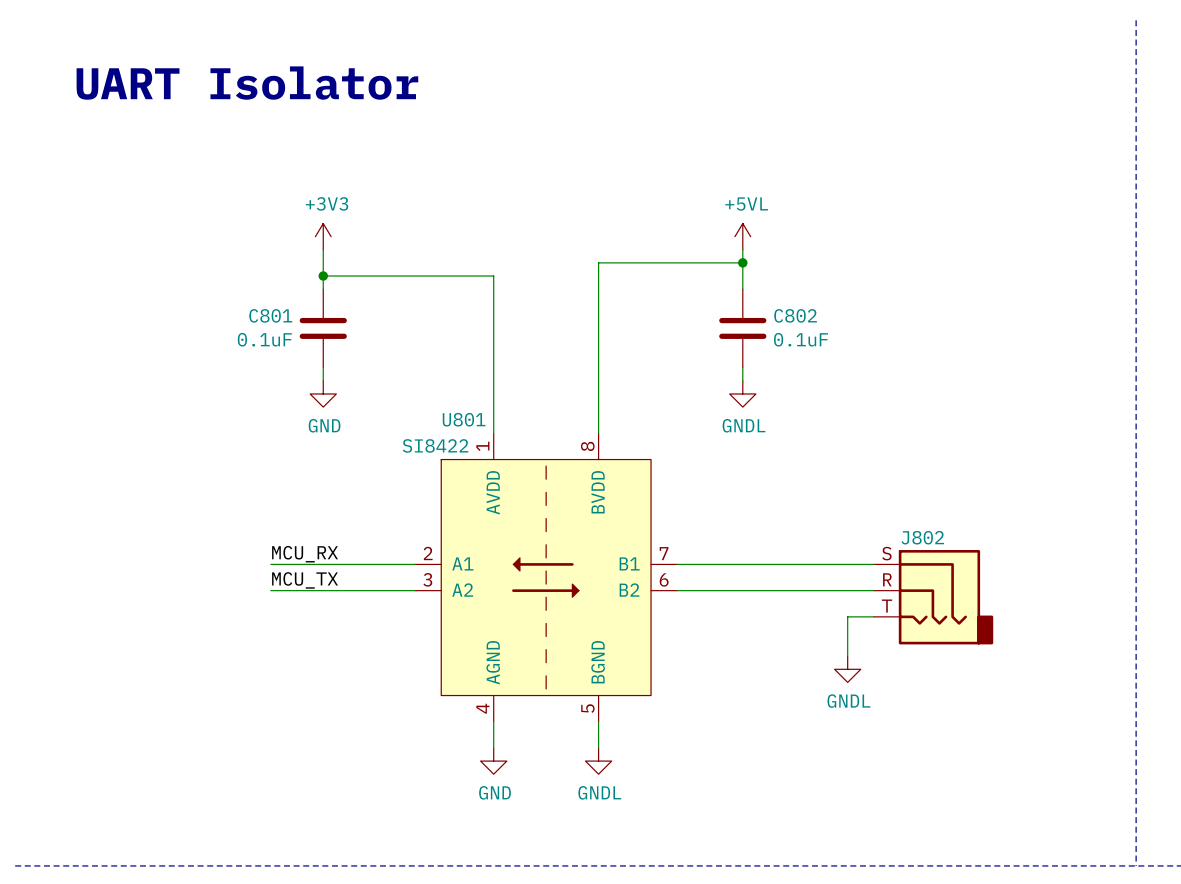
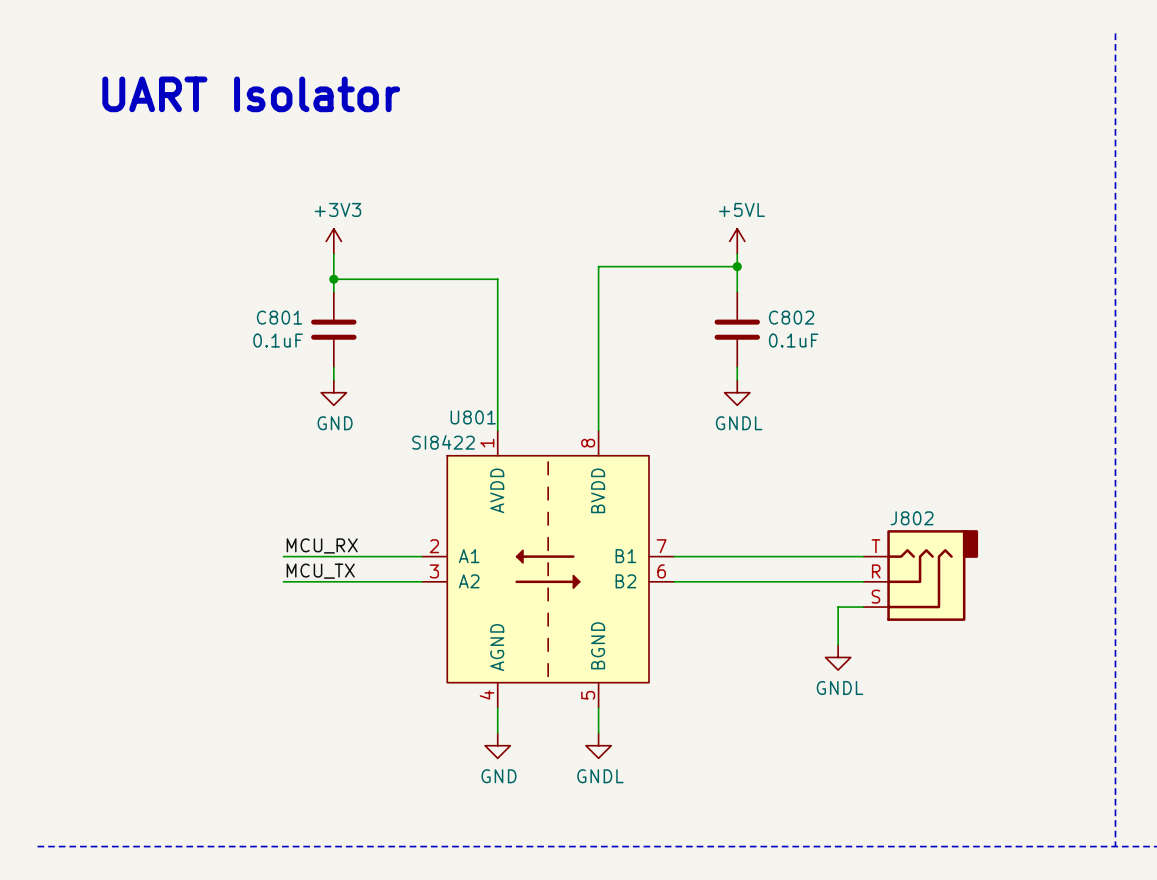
J802 flip: as is (946, 597) -> up-down (932, 575)

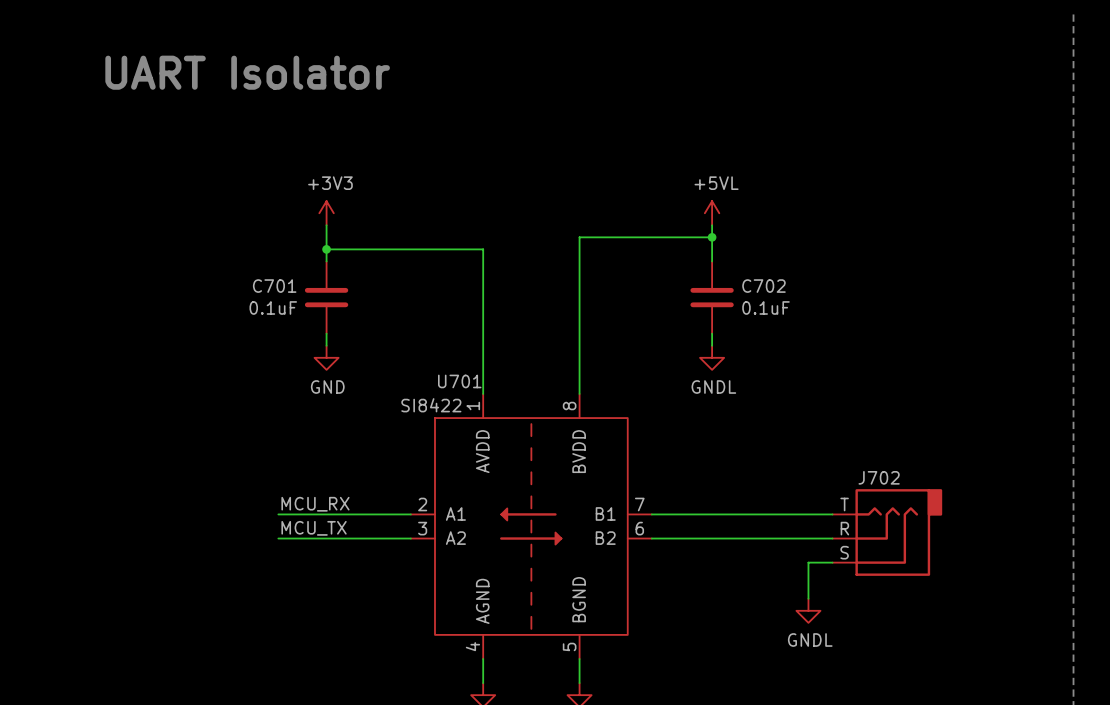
C801 name: C801 (279, 317) -> C701 (274, 286)
C802 name: C802 (791, 317) -> C702 (763, 286)
U801 name: U801 (473, 417) -> U701 (459, 381)
J802 name: J802 (912, 518) -> J702 (879, 477)

